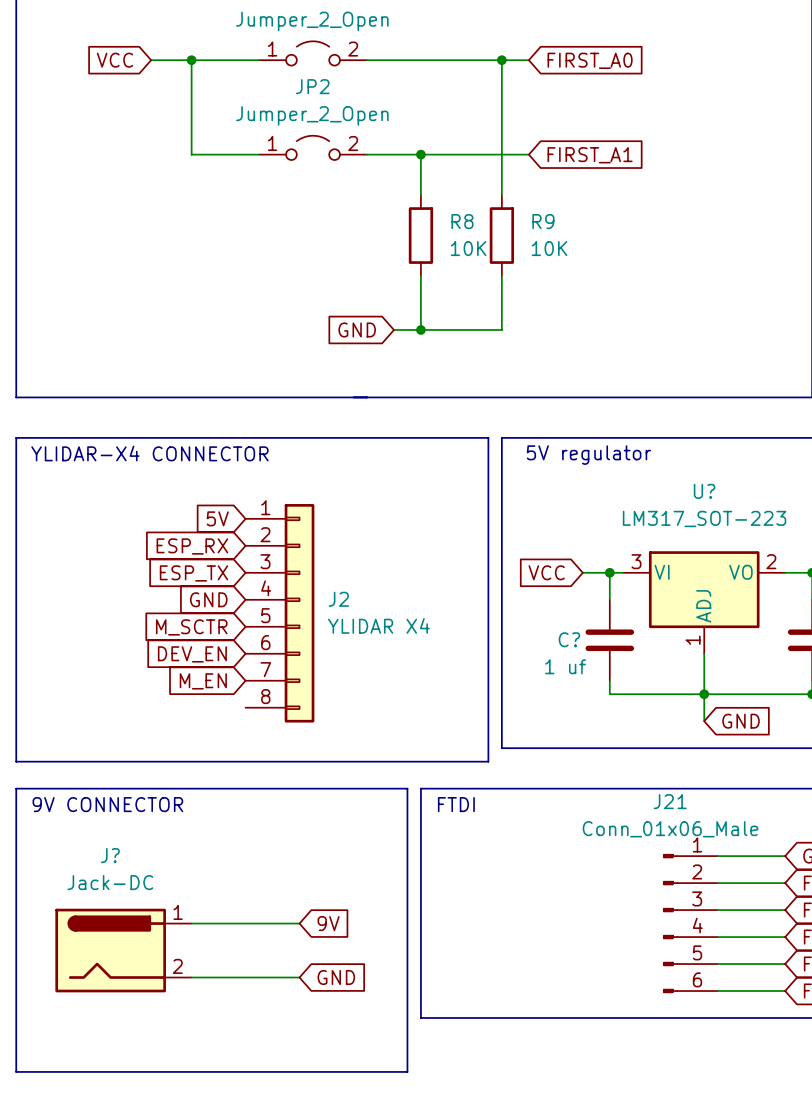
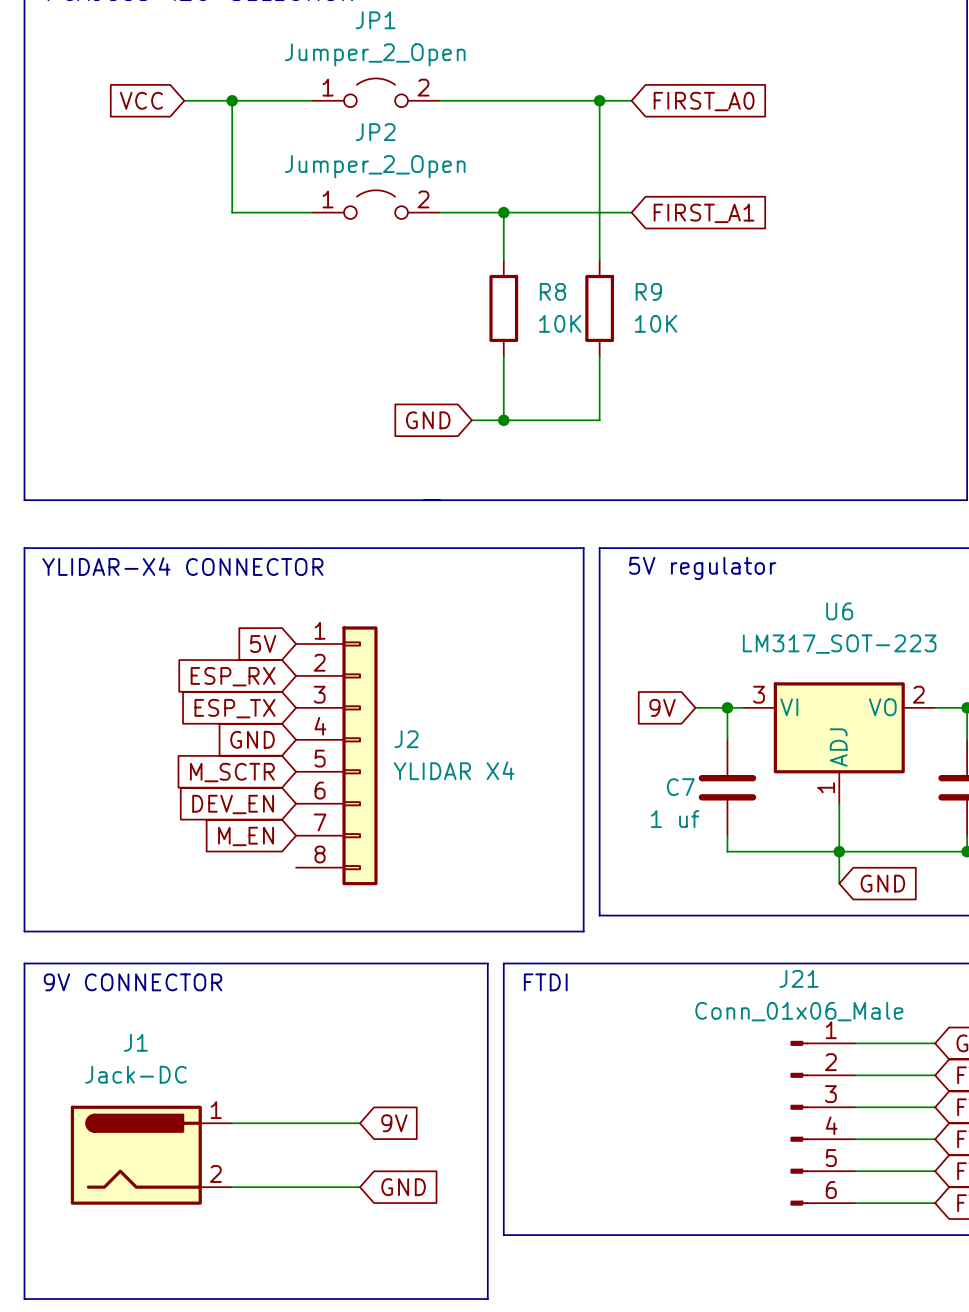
U? name: U? (704, 491) -> U6 (839, 611)
global label: VCC (546, 572) -> 9V (662, 707)
C? name: C? (569, 639) -> C7 (680, 787)
J? name: J? (110, 855) -> J1 (135, 1042)

